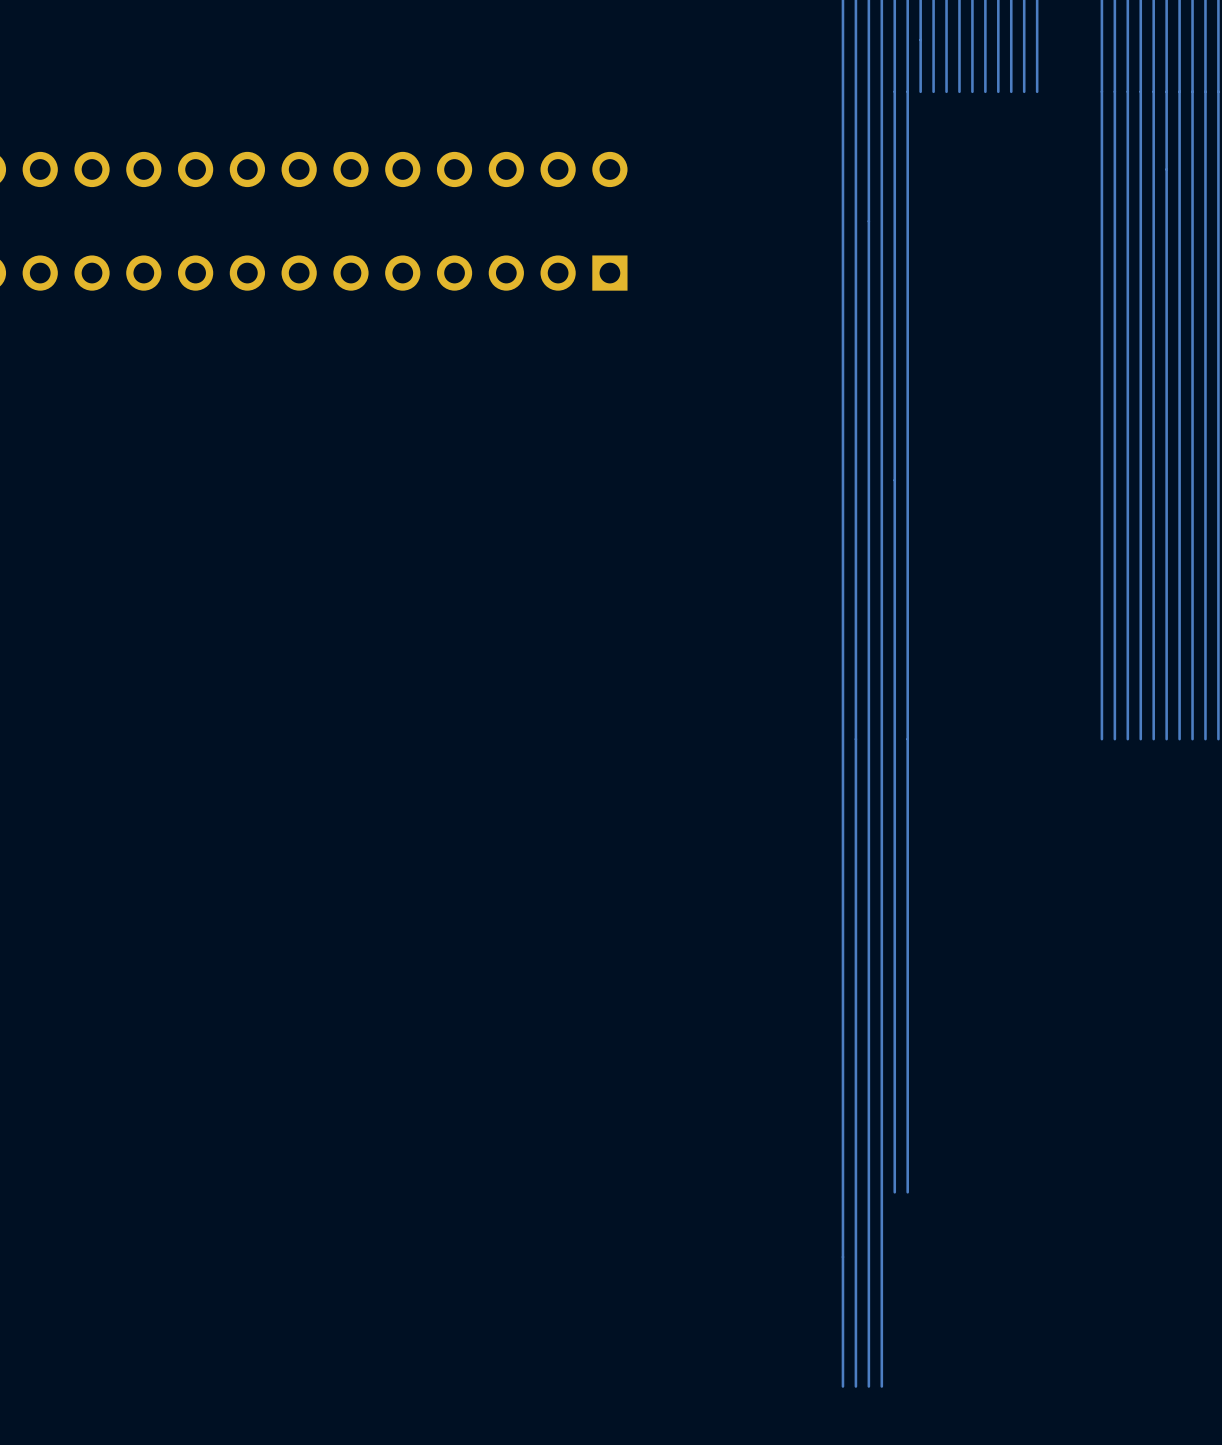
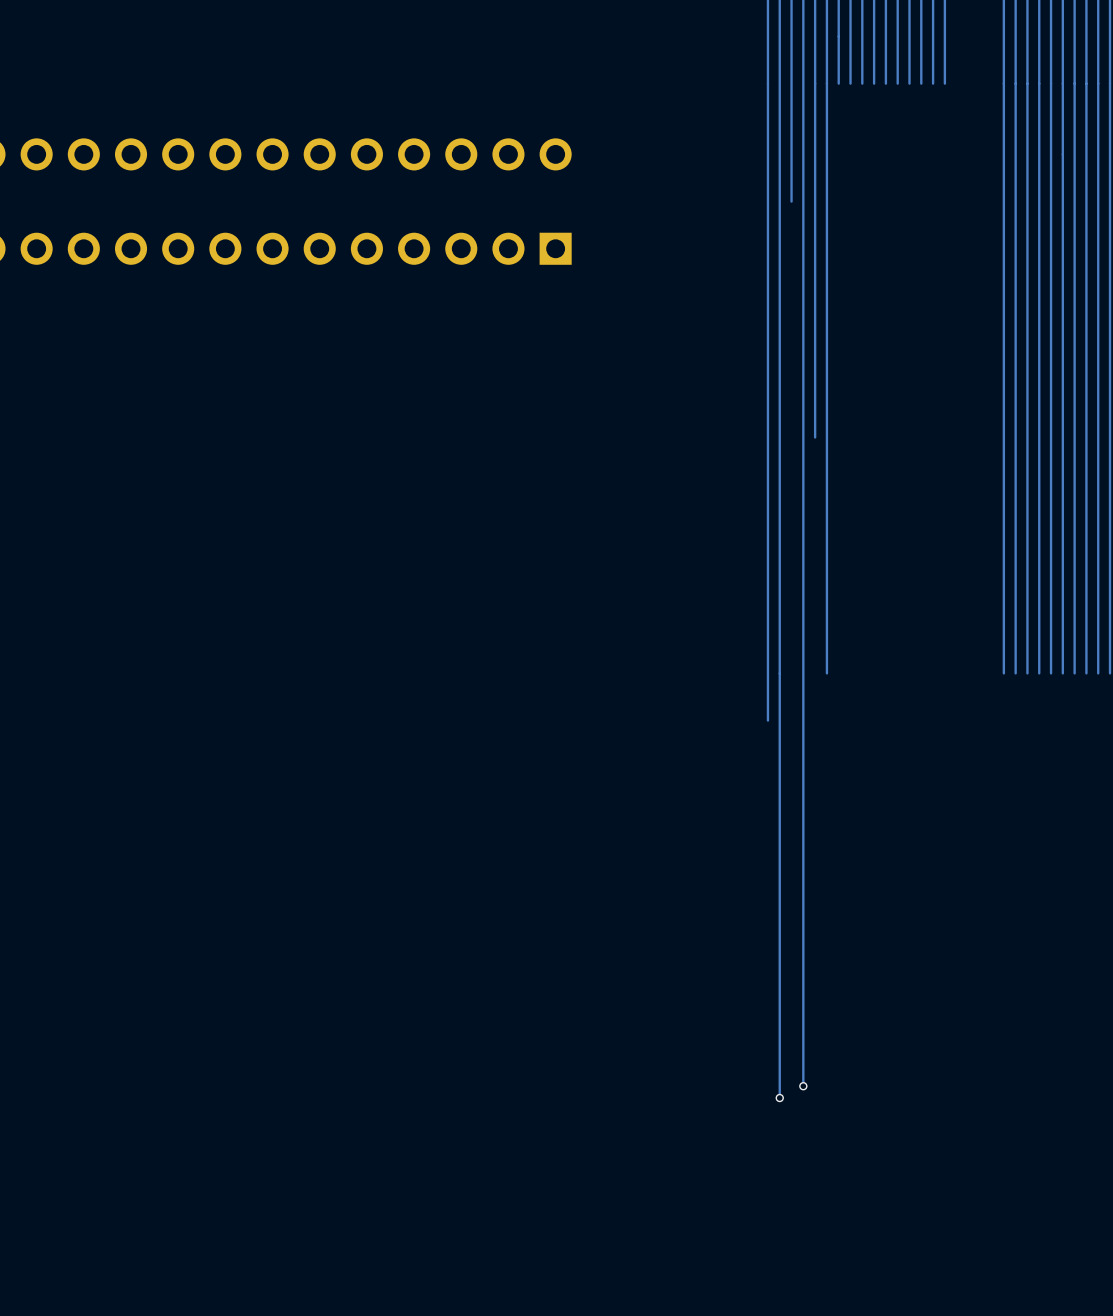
track: (868, 221) (868, 1386) -> none
track: (894, 480) (894, 1192) -> none
track: (907, 739) (907, 1192) -> none
track: (842, 790) (842, 1386) -> none
track: (881, 1192) (881, 1386) -> none
via: none -> (803, 1086)
track: (855, 1205) (855, 1386) -> none
via: none -> (779, 1098)

